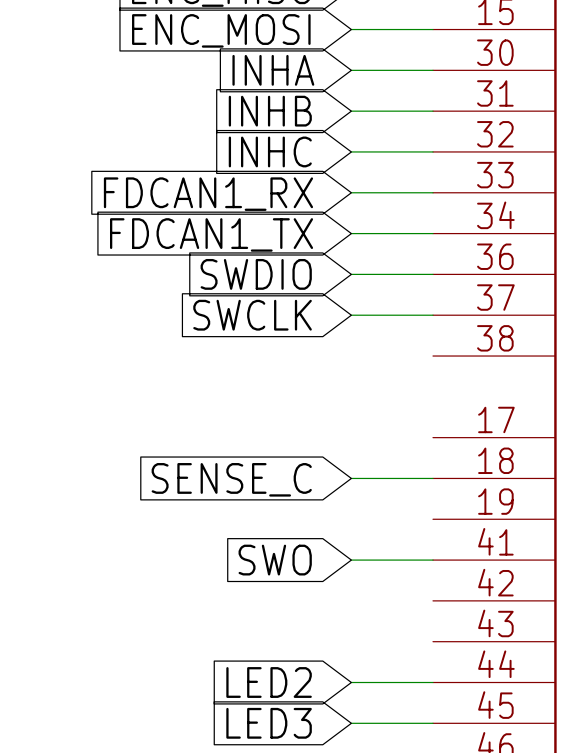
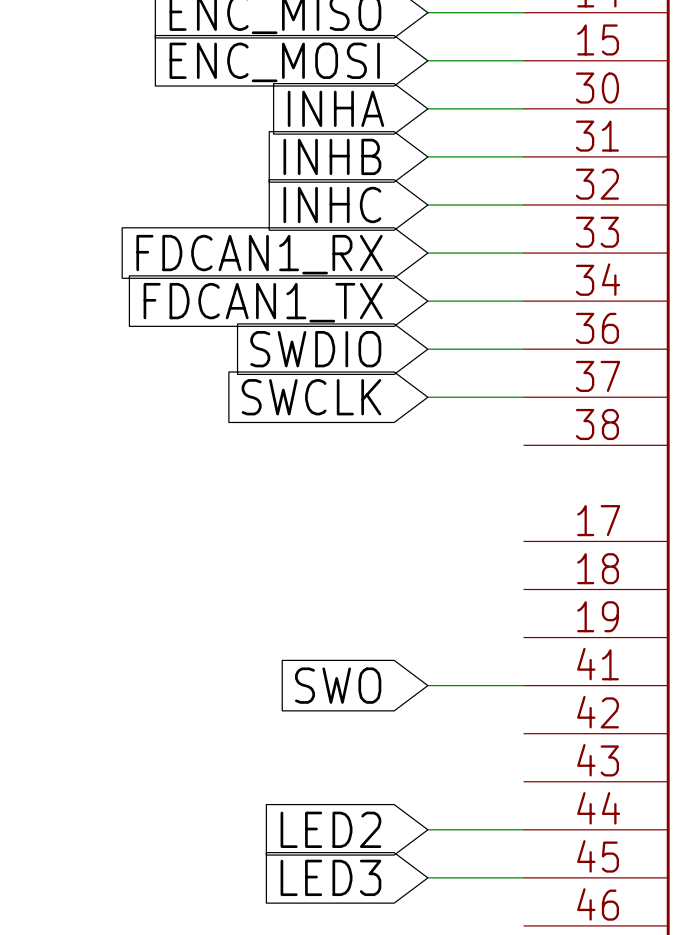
wire: (351, 478) (433, 478) -> none
global label: SENSE_C (231, 479) -> none

